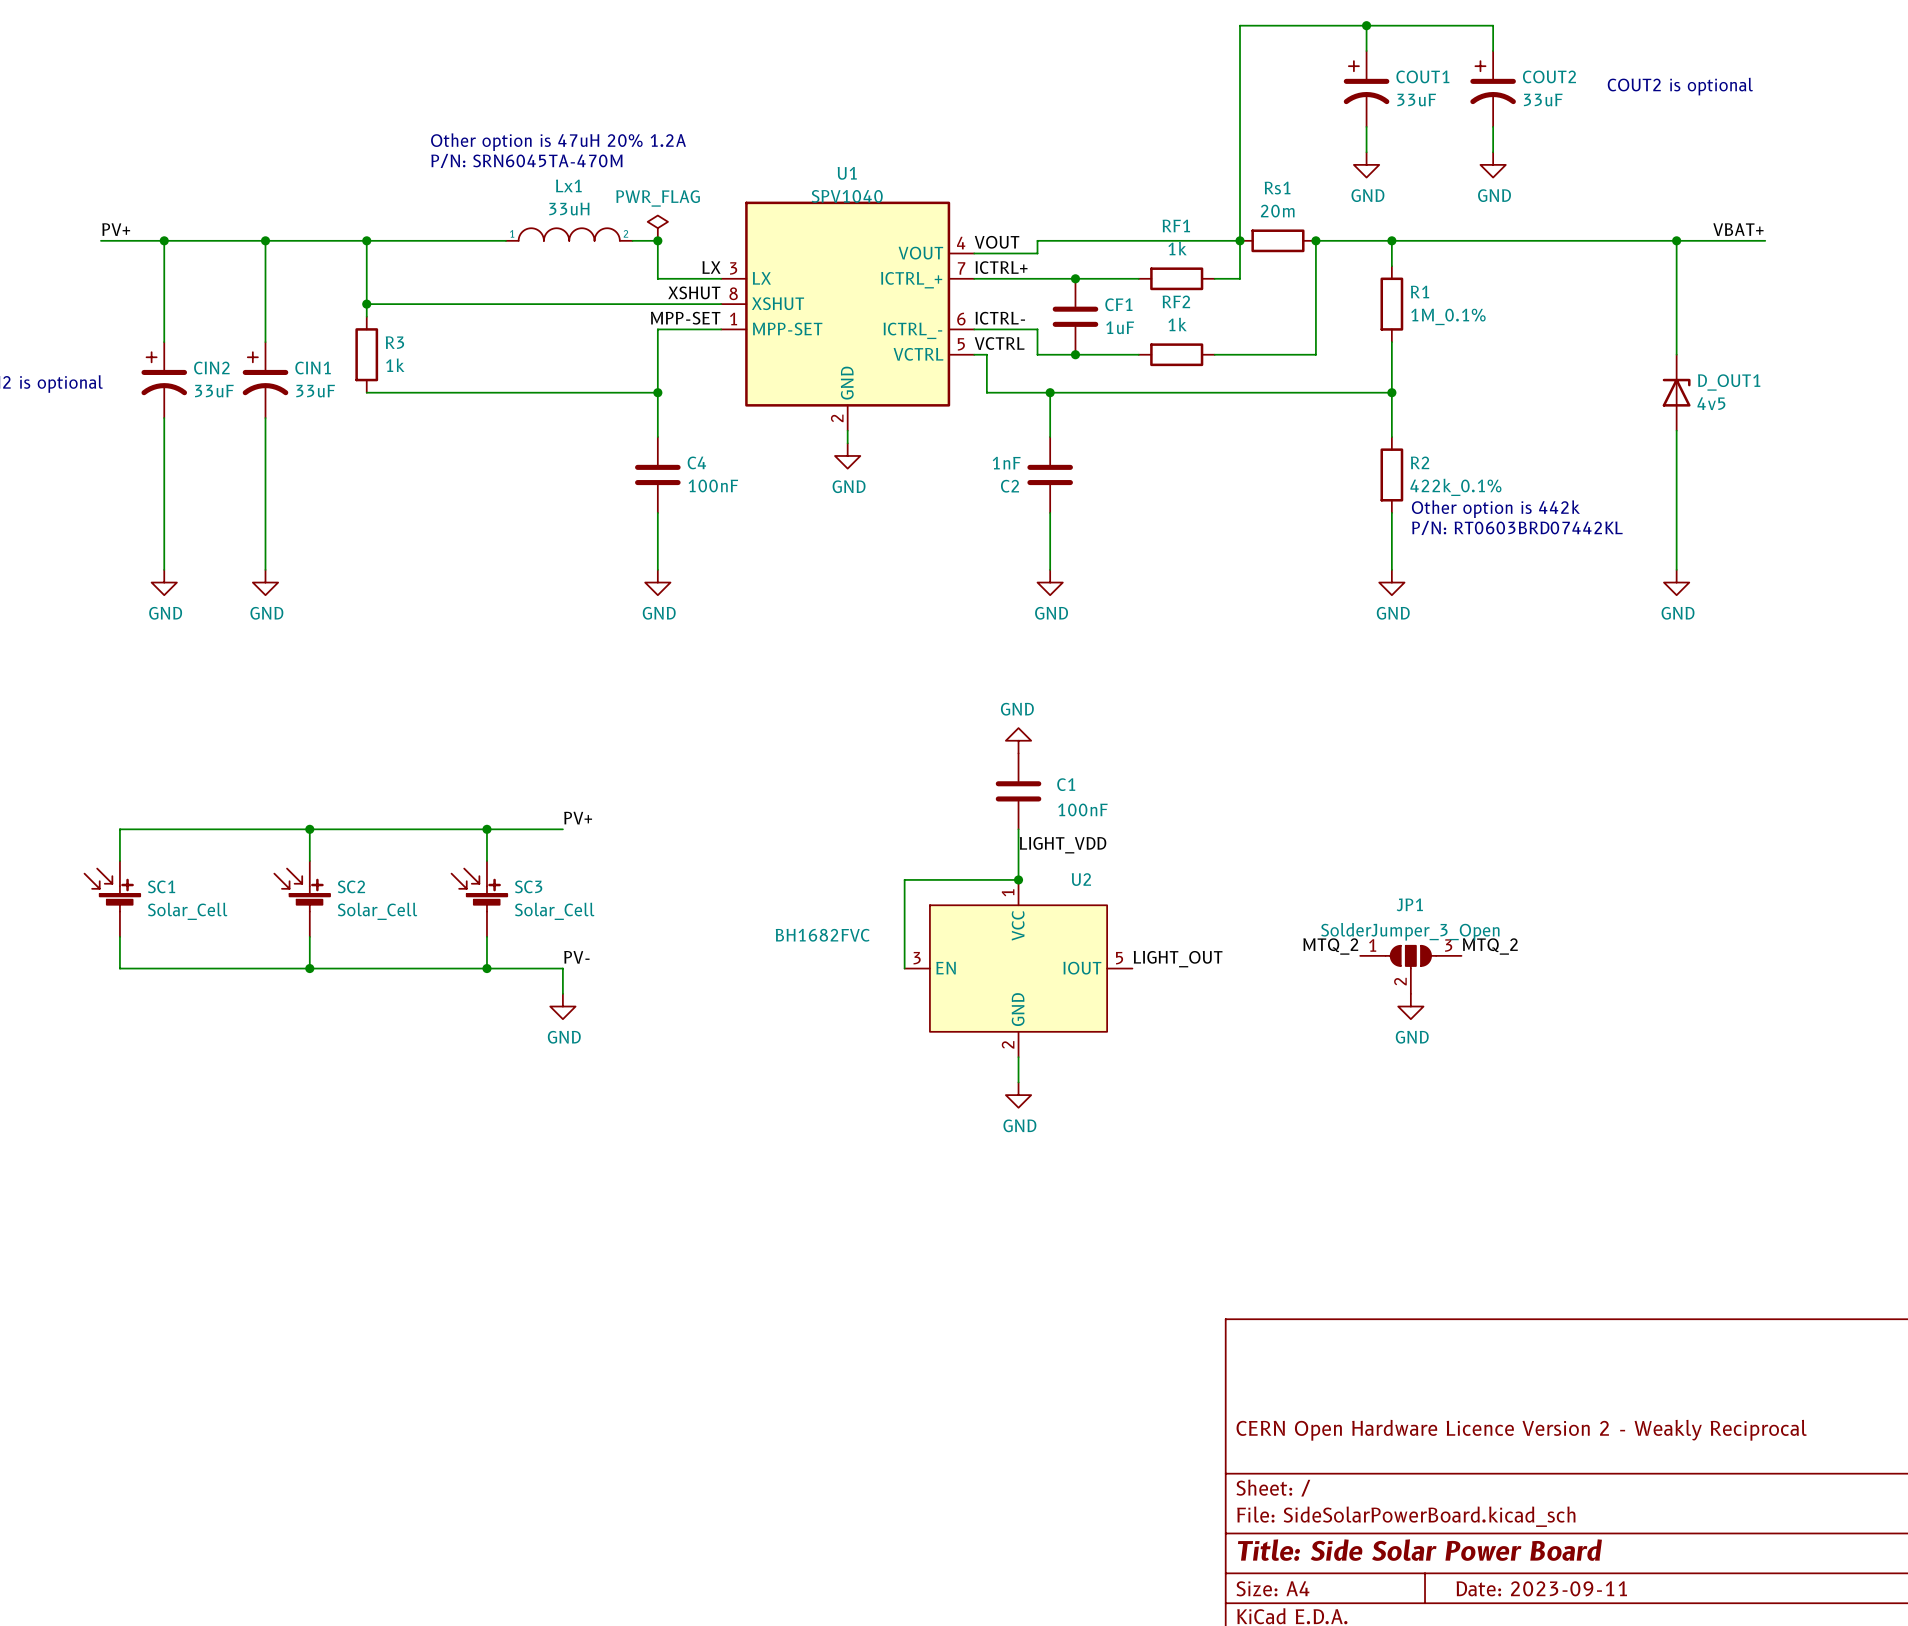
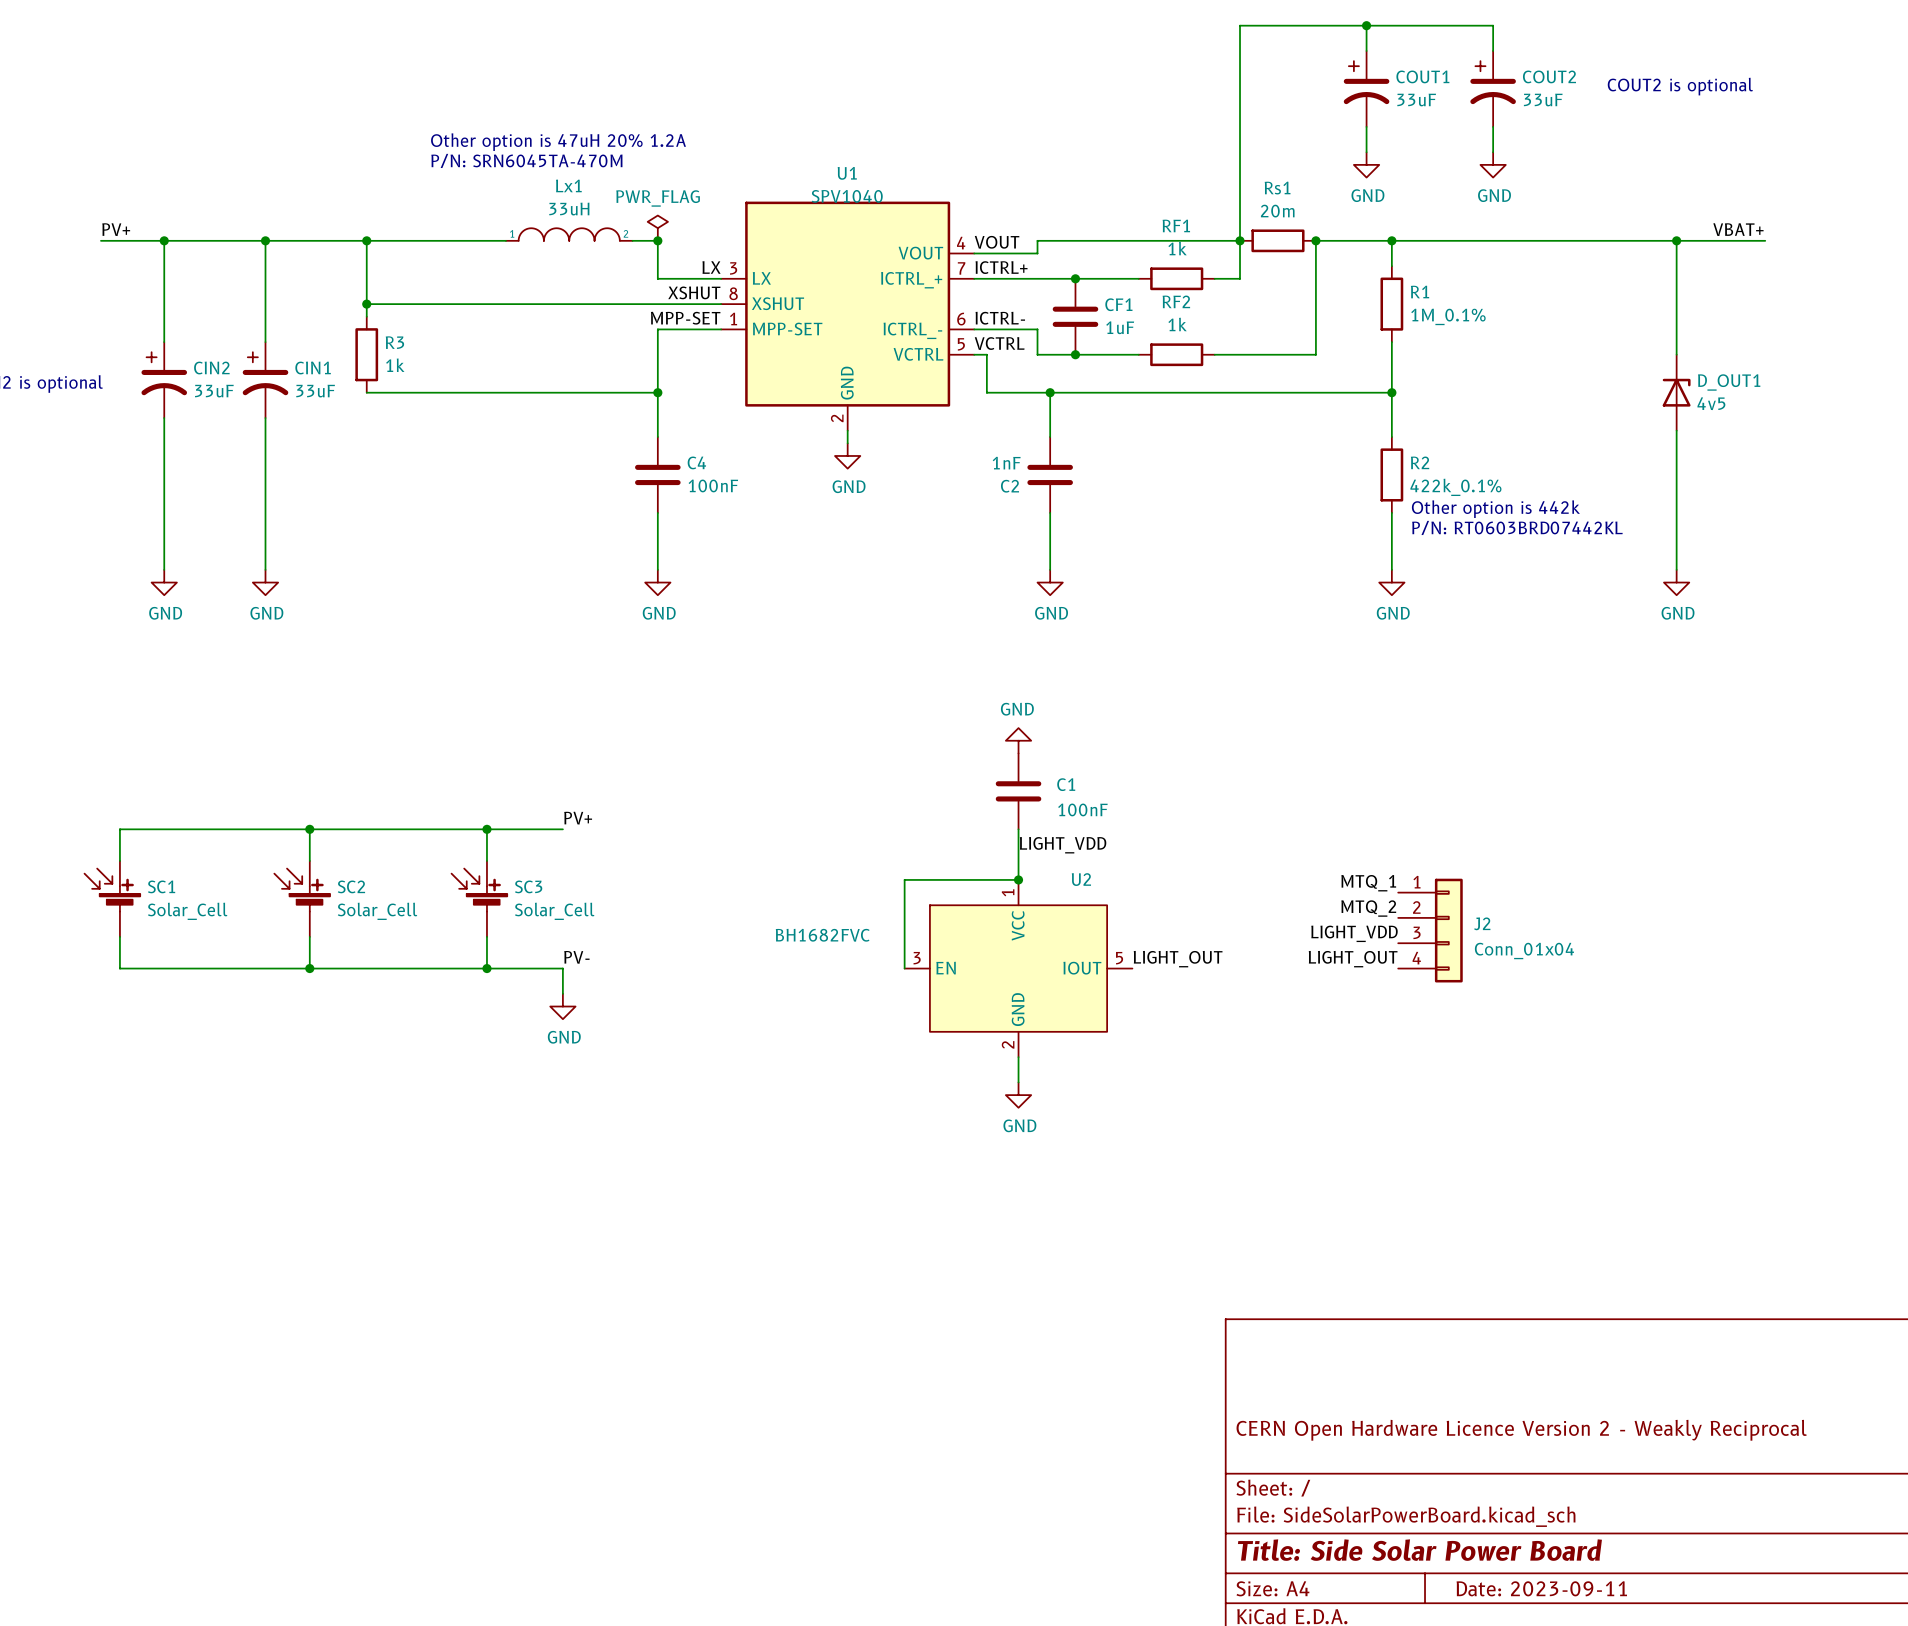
label: none -> MTQ_1 (1368, 883)
label: none -> MTQ_2 (1368, 908)
J2: none -> Conn_01x04 (1430, 930)
label: none -> LIGHT_VDD (1354, 933)
label: MTQ_2 (1330, 946) -> none
label: MTQ_2 (1490, 946) -> none
label: none -> LIGHT_OUT (1353, 959)
JP1: SolderJumper_3_Open (1410, 969) -> none
power symbol: GND (1410, 1006) -> none

